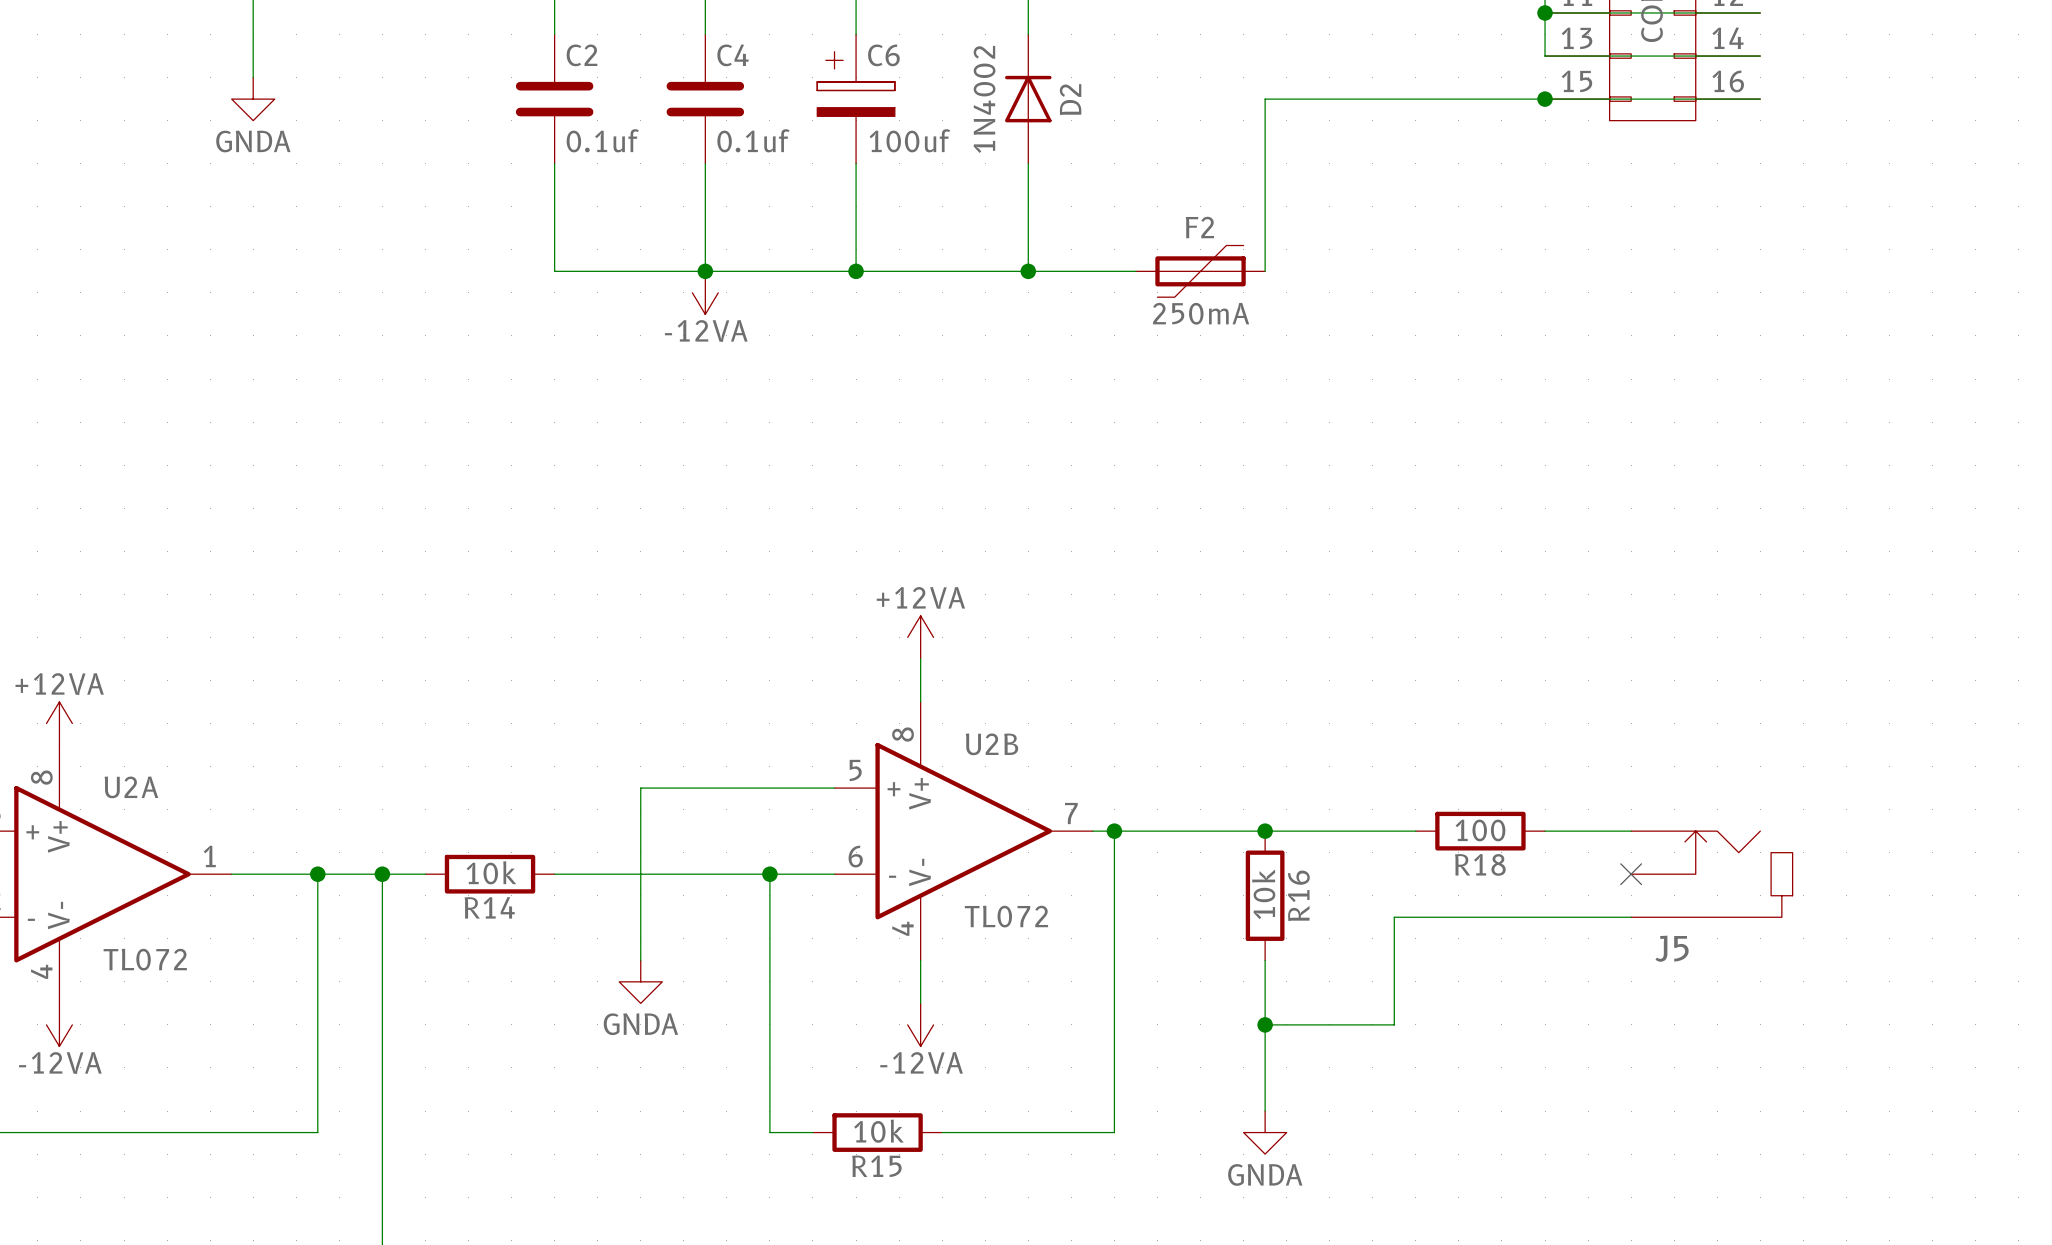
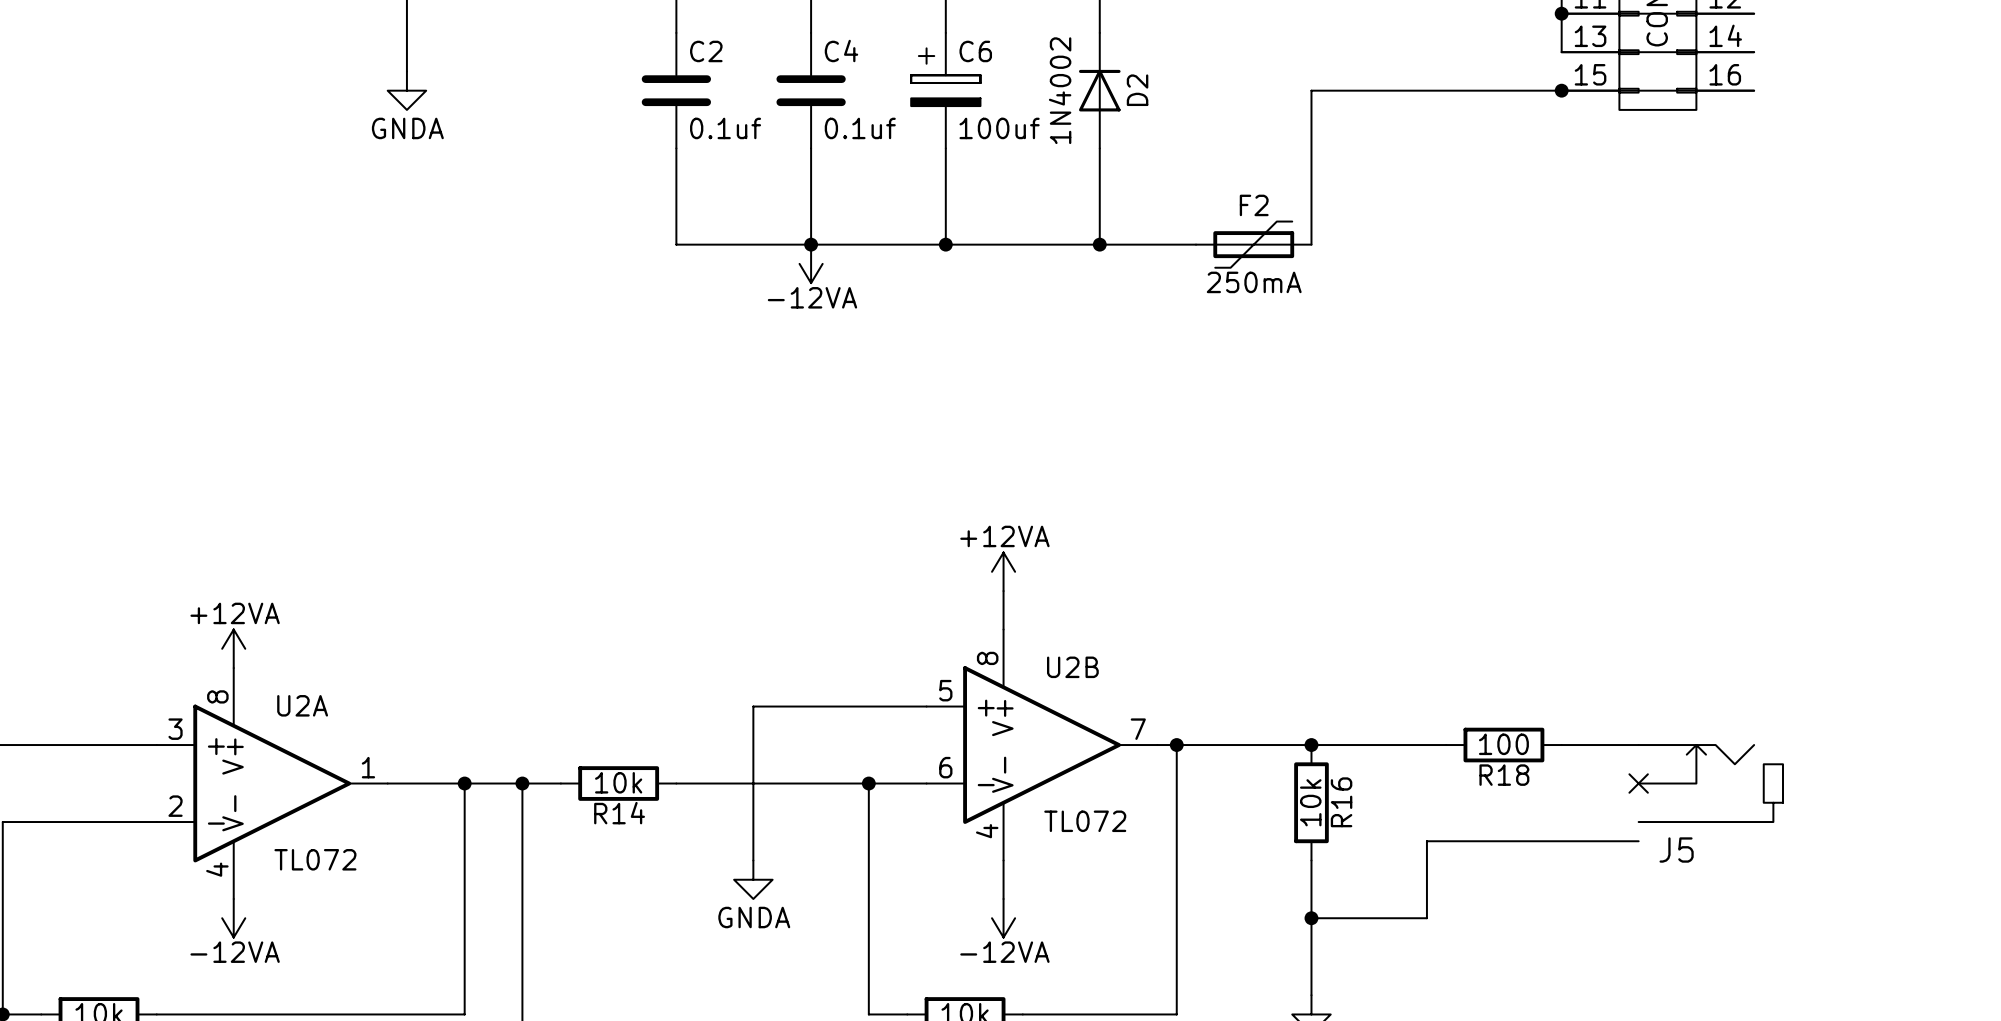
wire: (1631, 917) (1394, 917) (1394, 938) -> (1638, 841) (1426, 841)

